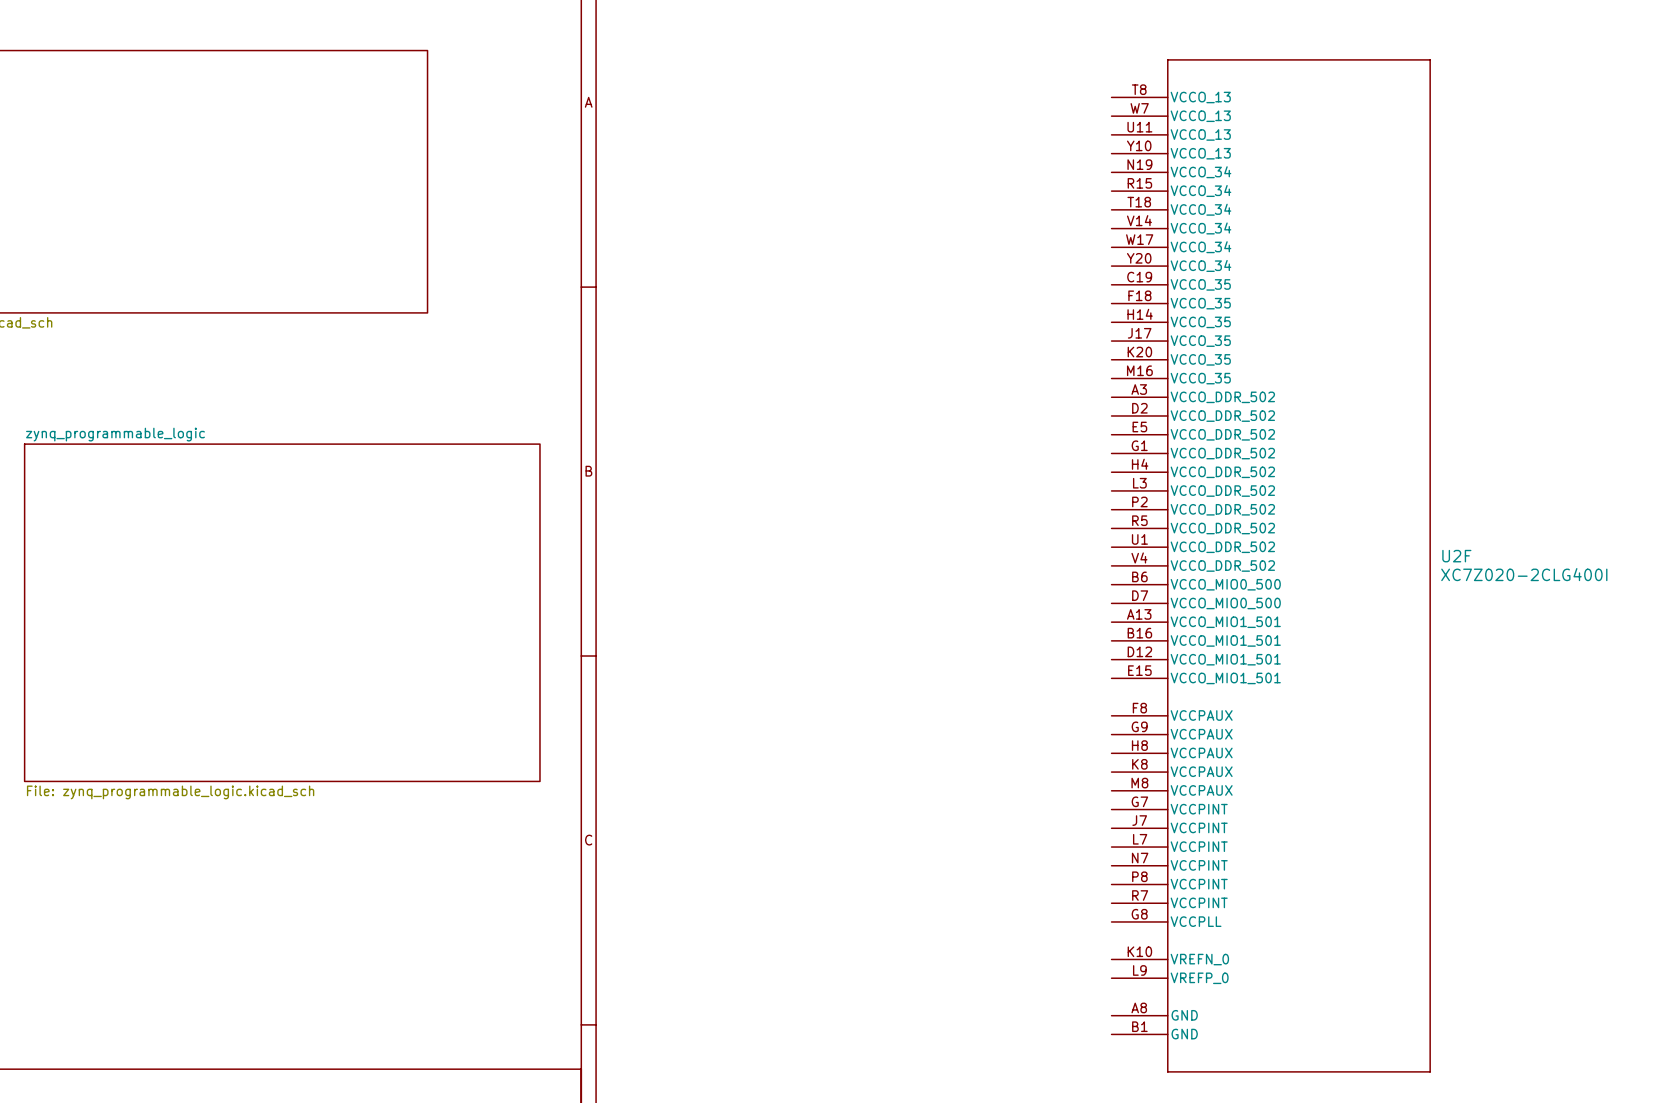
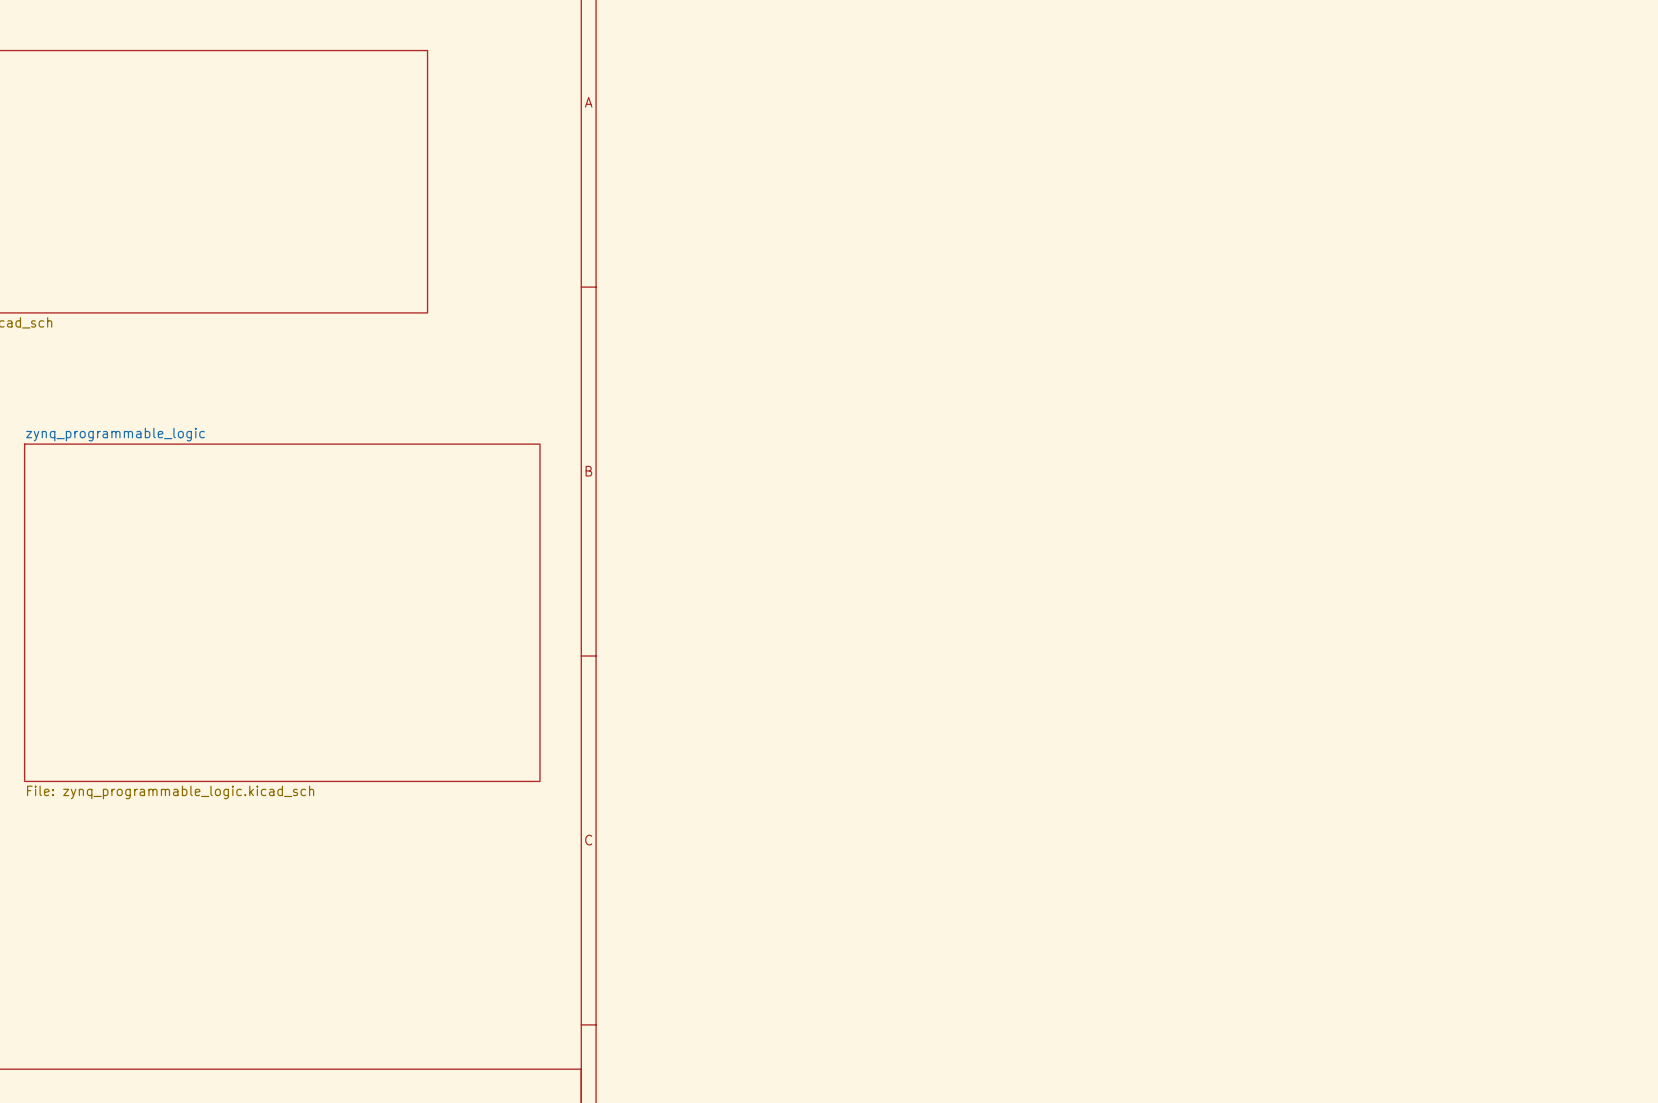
U2F: XC7Z020-2CLG400I (1271, 565) -> none

